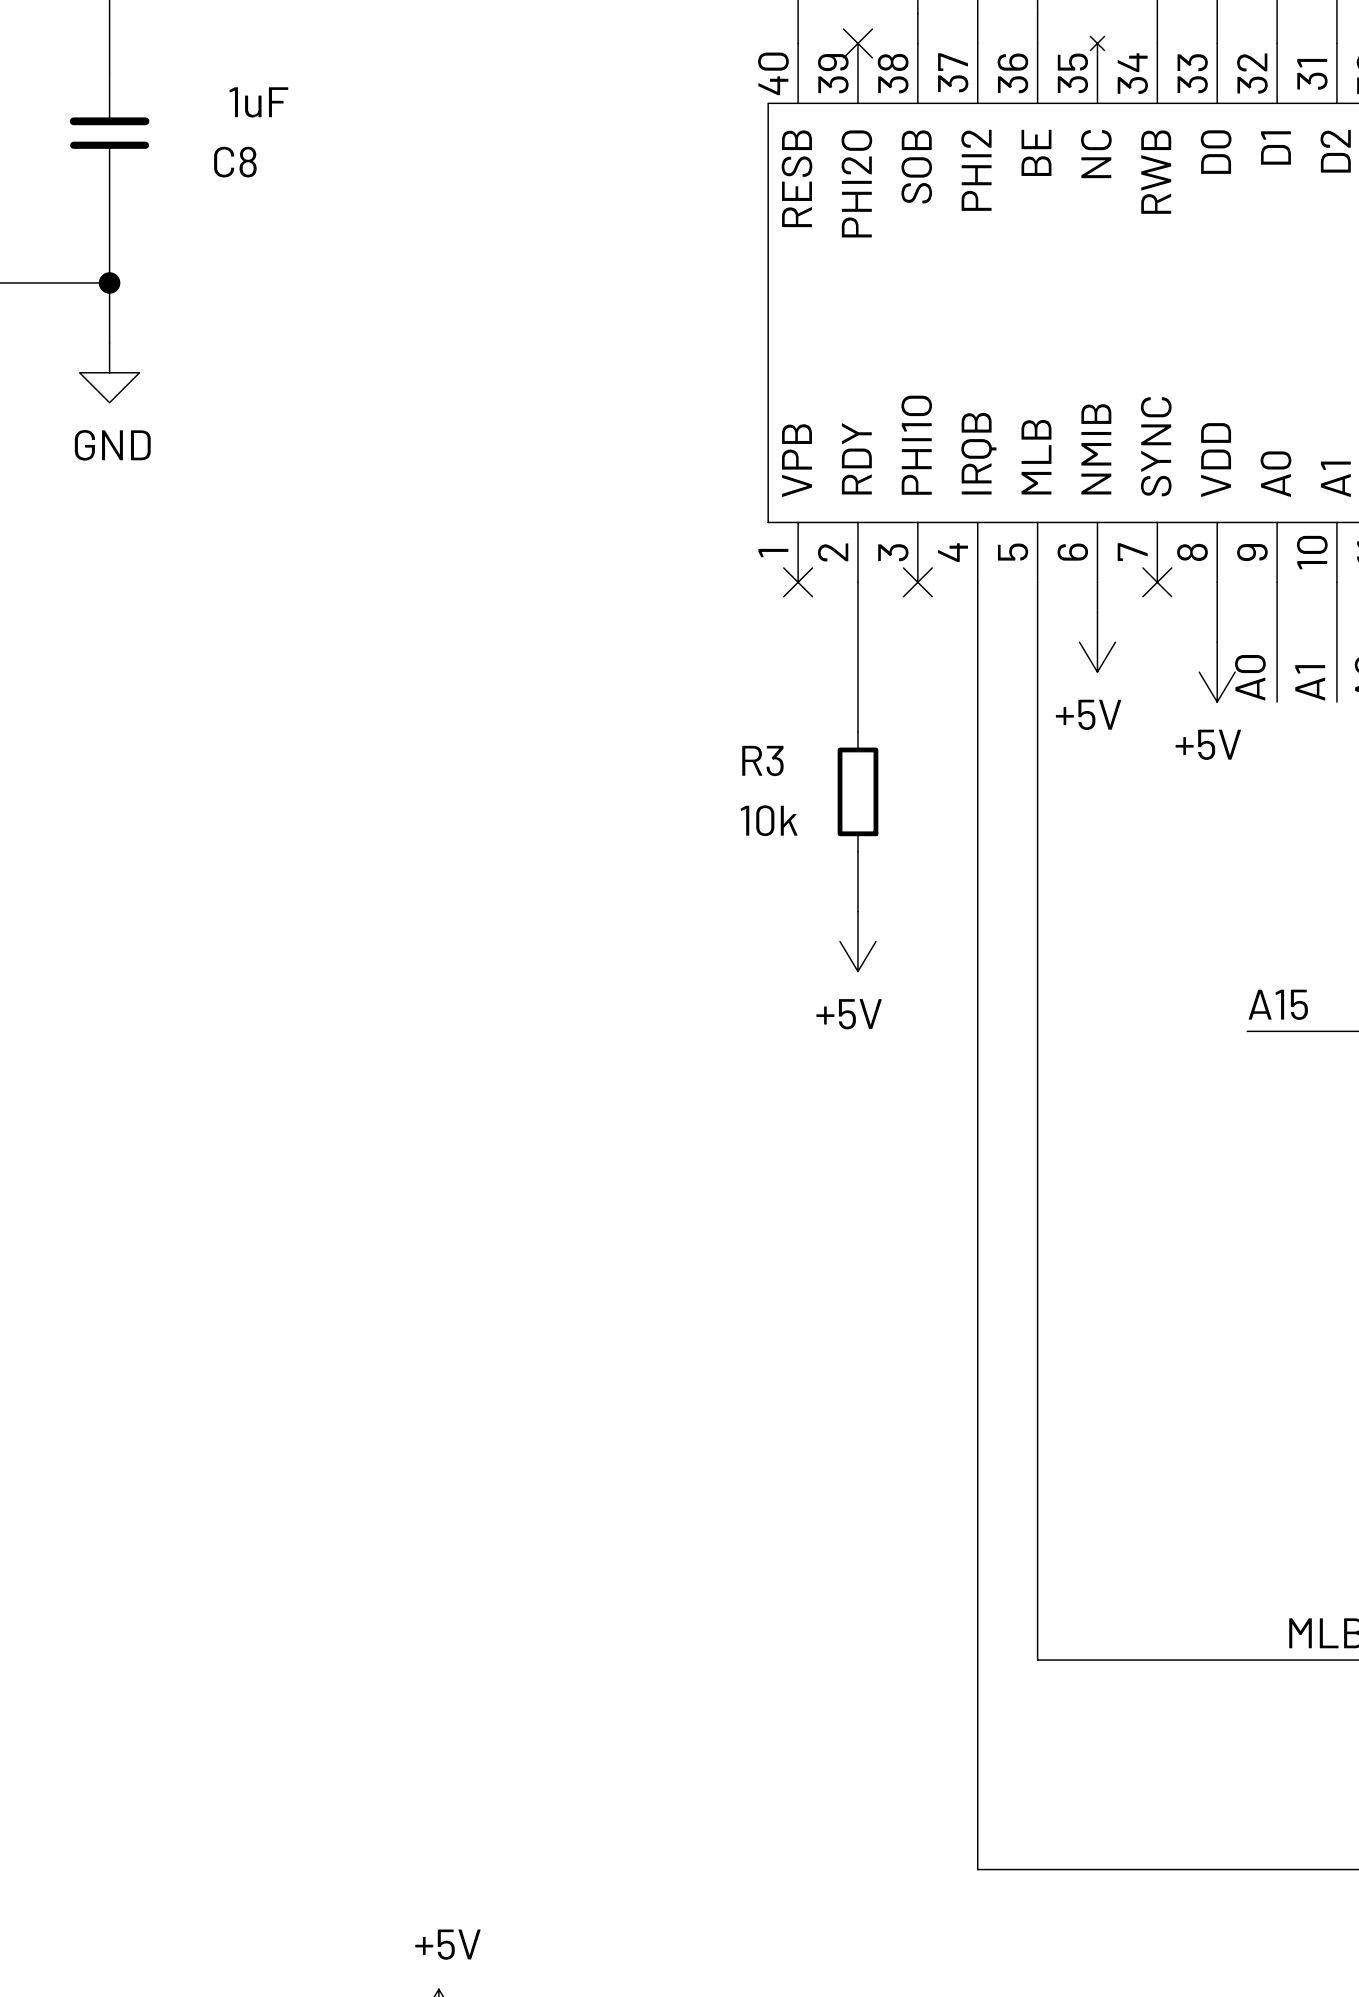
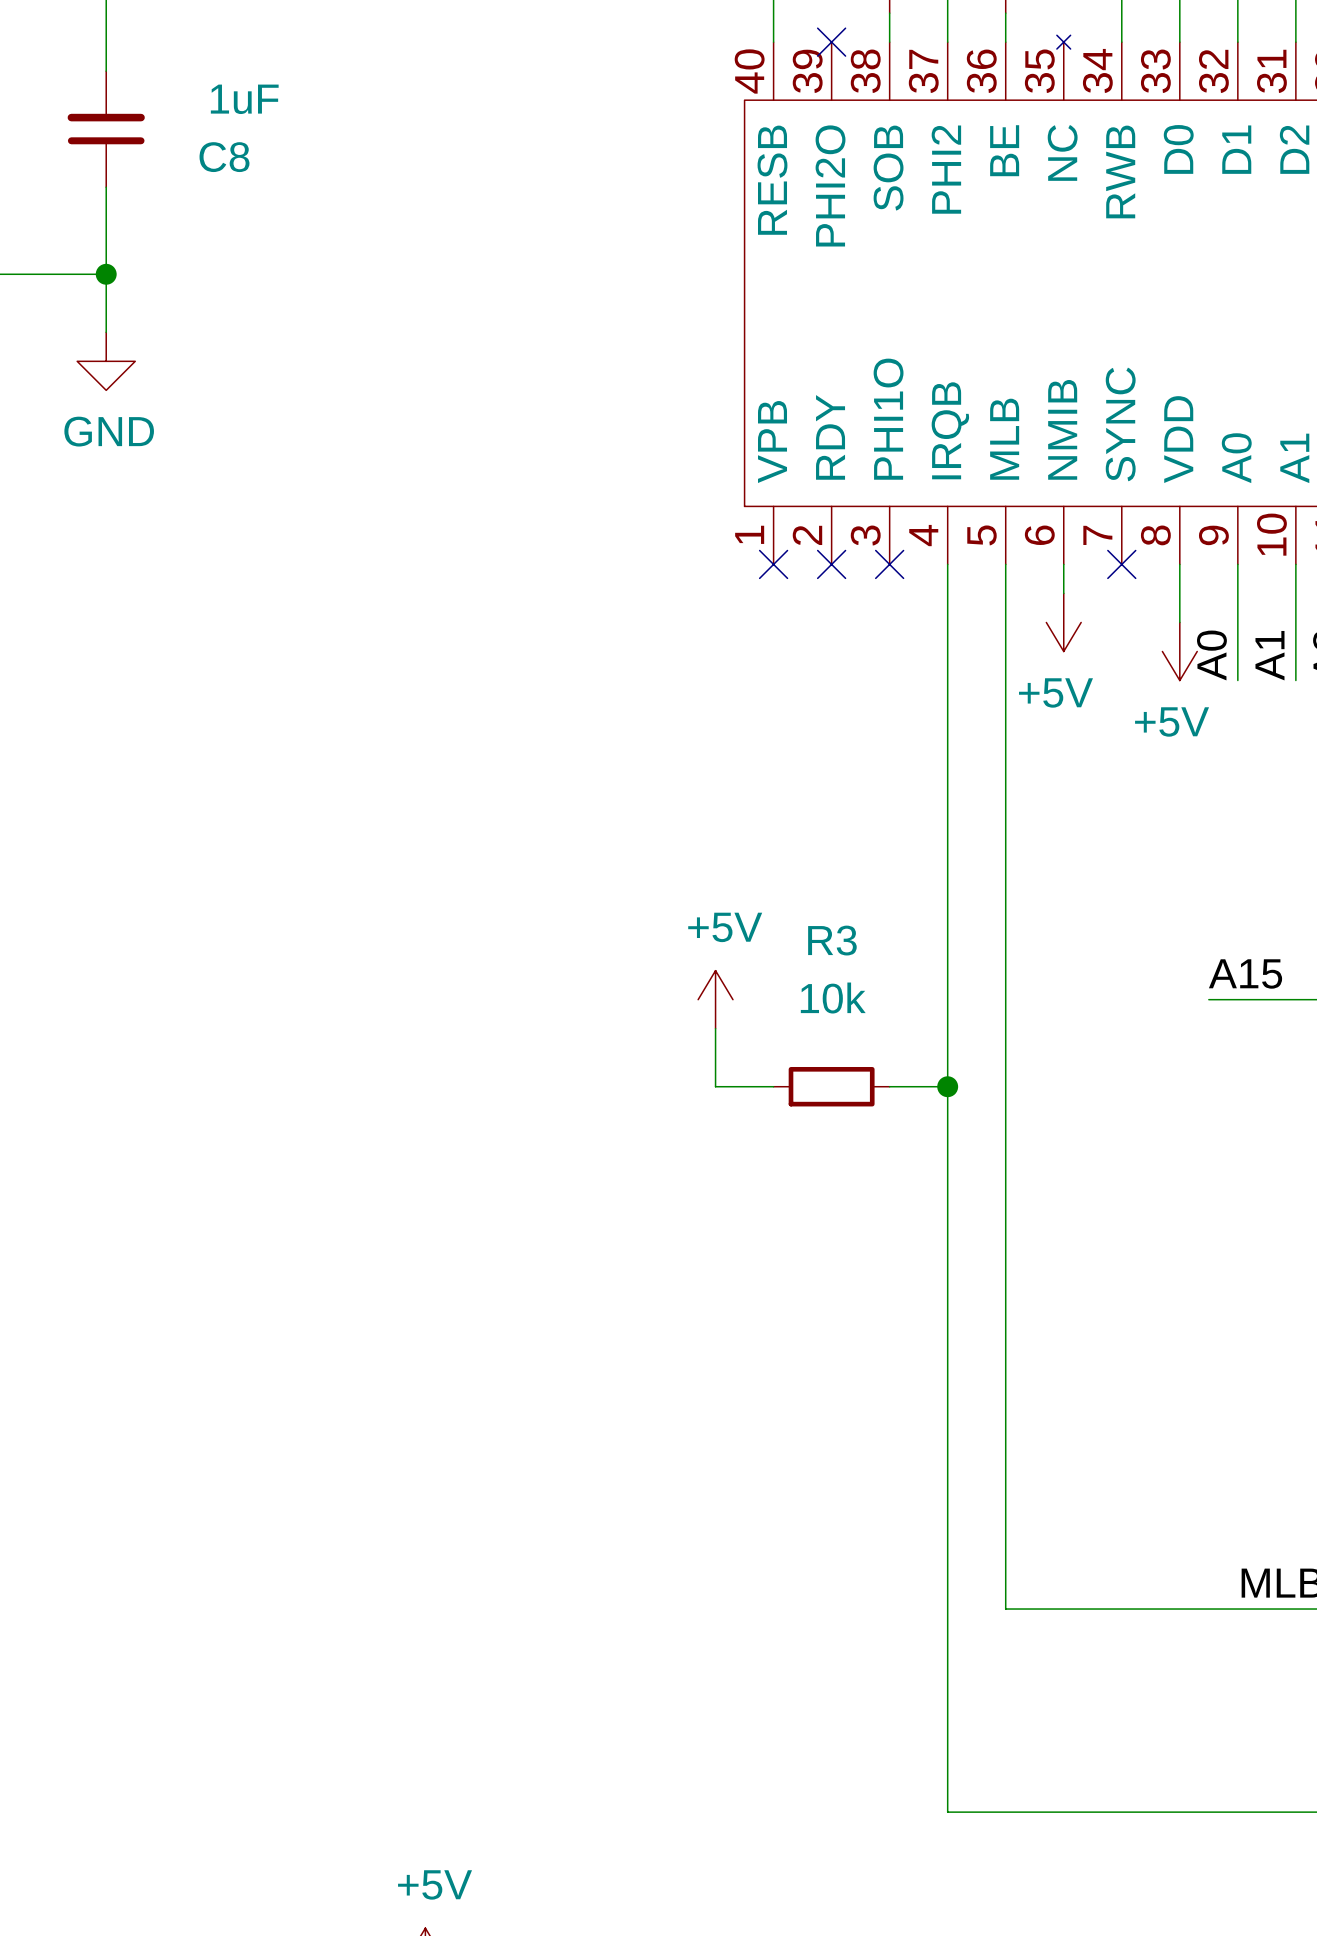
wire: (857, 582) (857, 732) -> none
no-connect mark: none -> (831, 564)
R3 name position: R3 (762, 760) -> R3 (832, 940)
R3 rotation: 0° (857, 791) -> 90° clockwise (831, 1086)
R3 position: (857, 791) -> (831, 1086)
wire: (857, 851) (857, 911) -> none
power symbol rotation: 0° (857, 941) -> 180° (715, 999)
power symbol position: +5V (857, 941) -> +5V (715, 999)
wire: none -> (715, 1028) (715, 1086) (773, 1086)
wire: none -> (889, 1086) (947, 1086)
junction: none -> (947, 1086)

